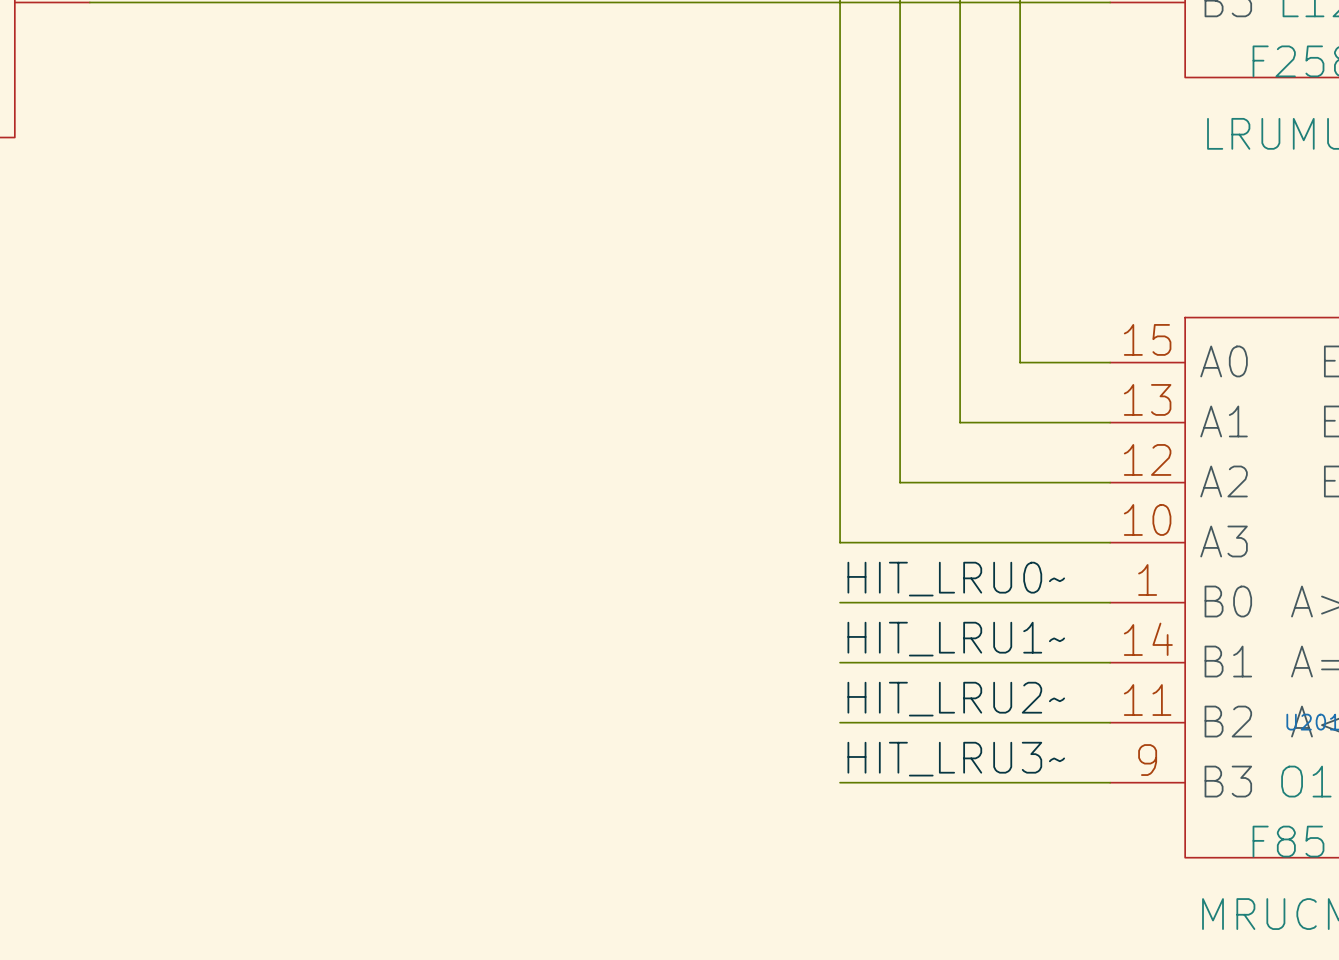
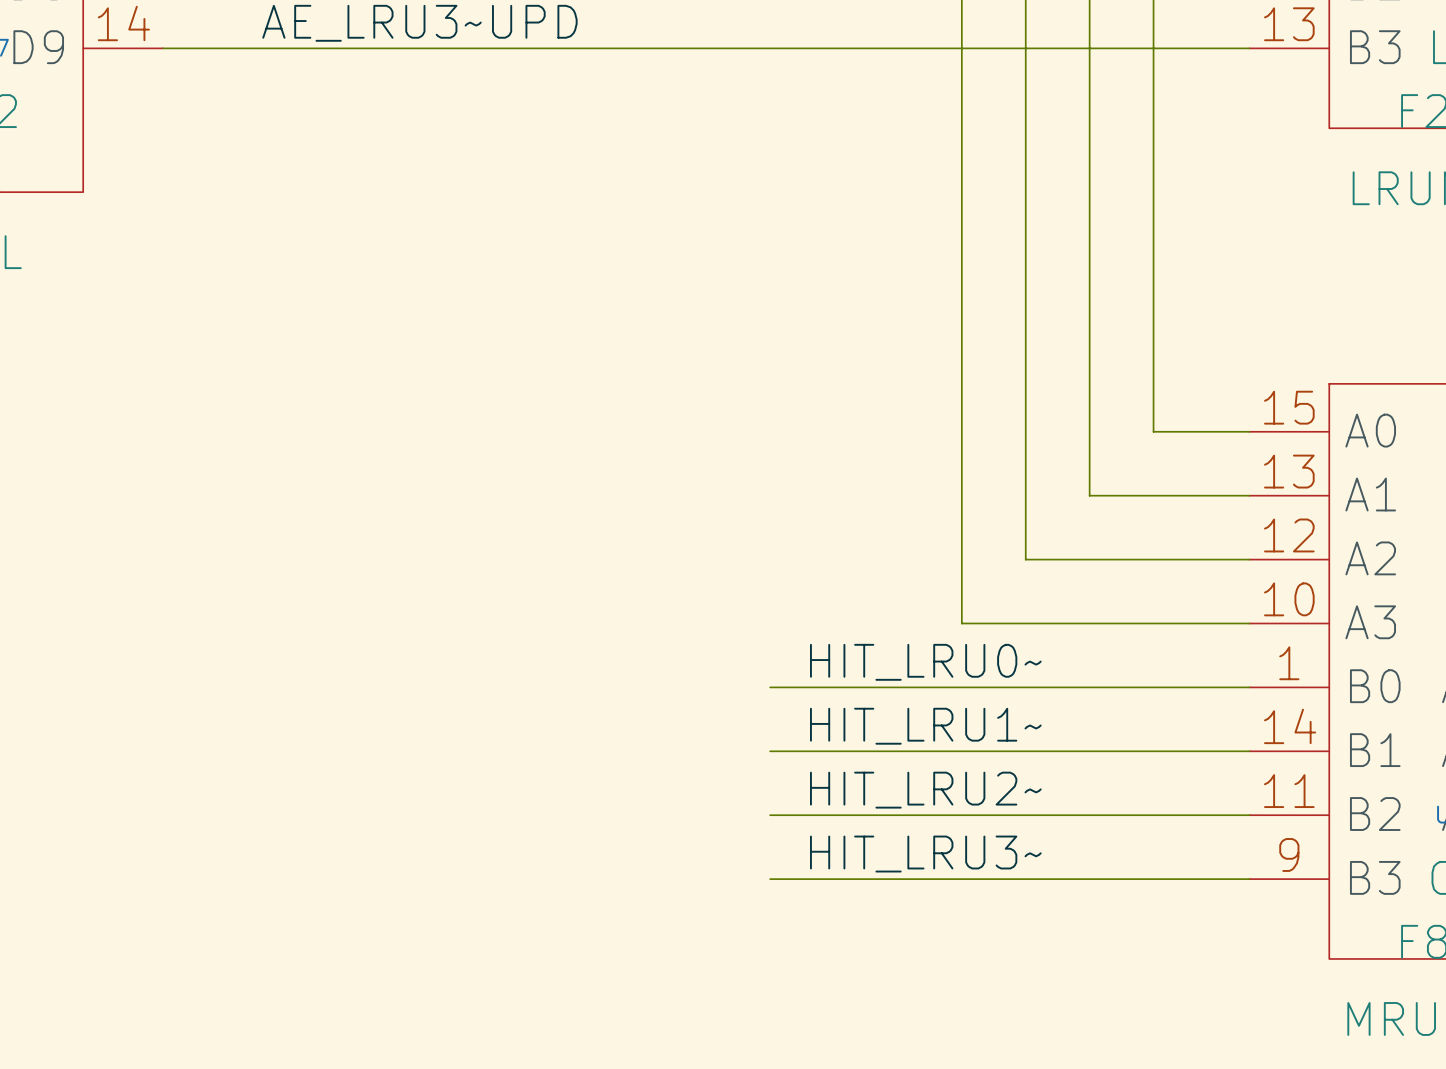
label position: HIT_LRU0~ (956, 579) -> HIT_LRU0~ (925, 662)
wire: none -> (770, 687) (961, 687)
label position: HIT_LRU1~ (956, 639) -> HIT_LRU1~ (925, 726)
wire: none -> (770, 751) (961, 751)
label position: HIT_LRU2~ (956, 699) -> HIT_LRU2~ (925, 790)
wire: none -> (770, 815) (961, 815)
label position: HIT_LRU3~ (956, 759) -> HIT_LRU3~ (925, 854)
wire: none -> (770, 879) (961, 879)

